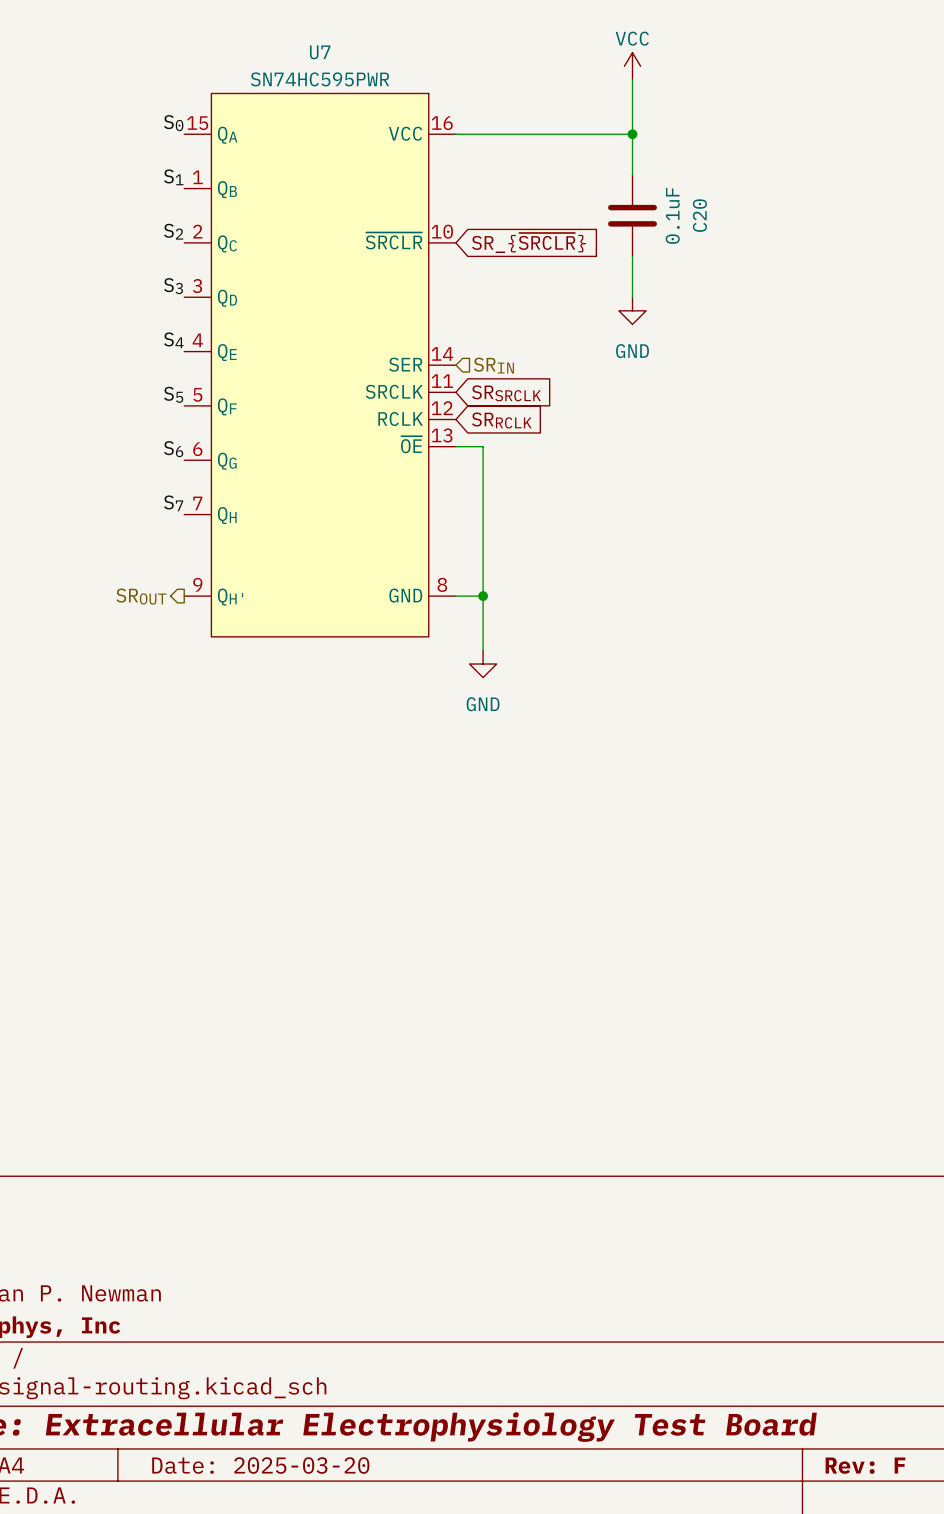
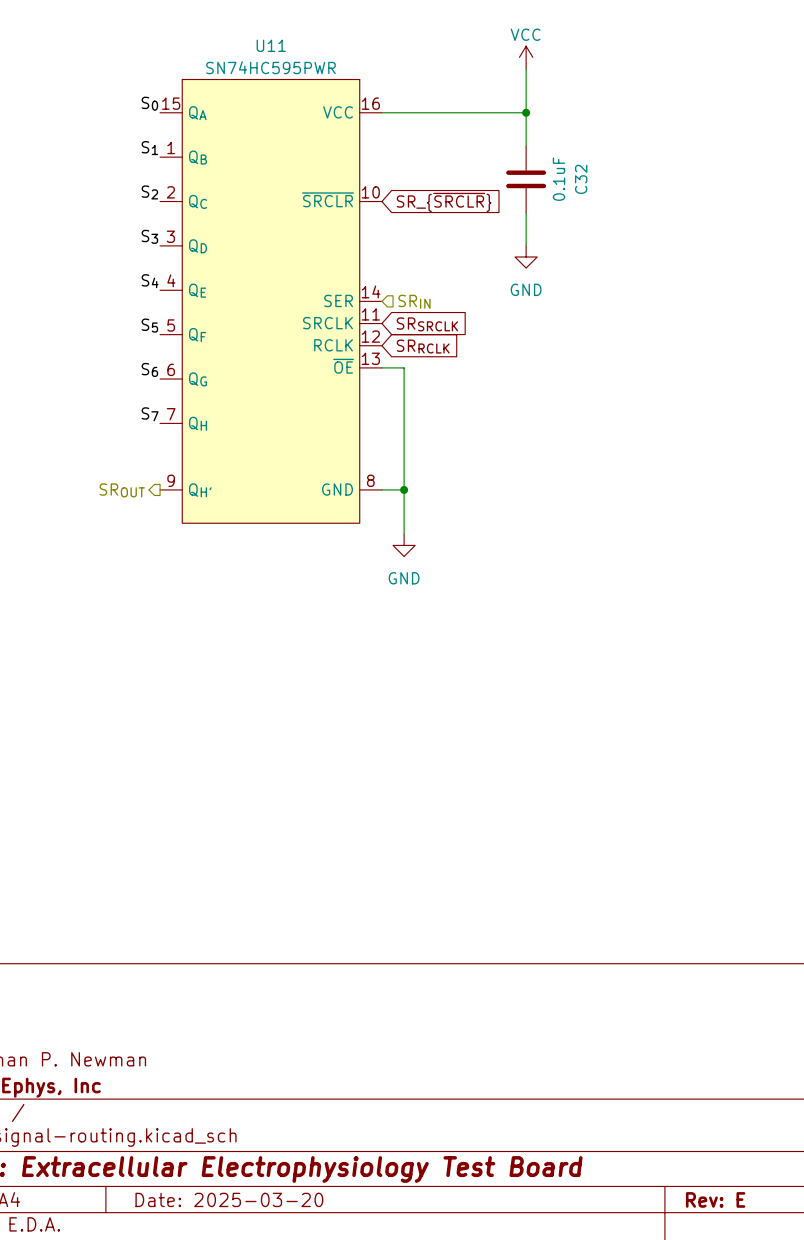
U7 name: U7 (320, 52) -> U11 (271, 45)
C20 name: C20 (699, 215) -> C32 (581, 179)
title block: Rev: F (865, 1465) -> Rev: E (715, 1199)

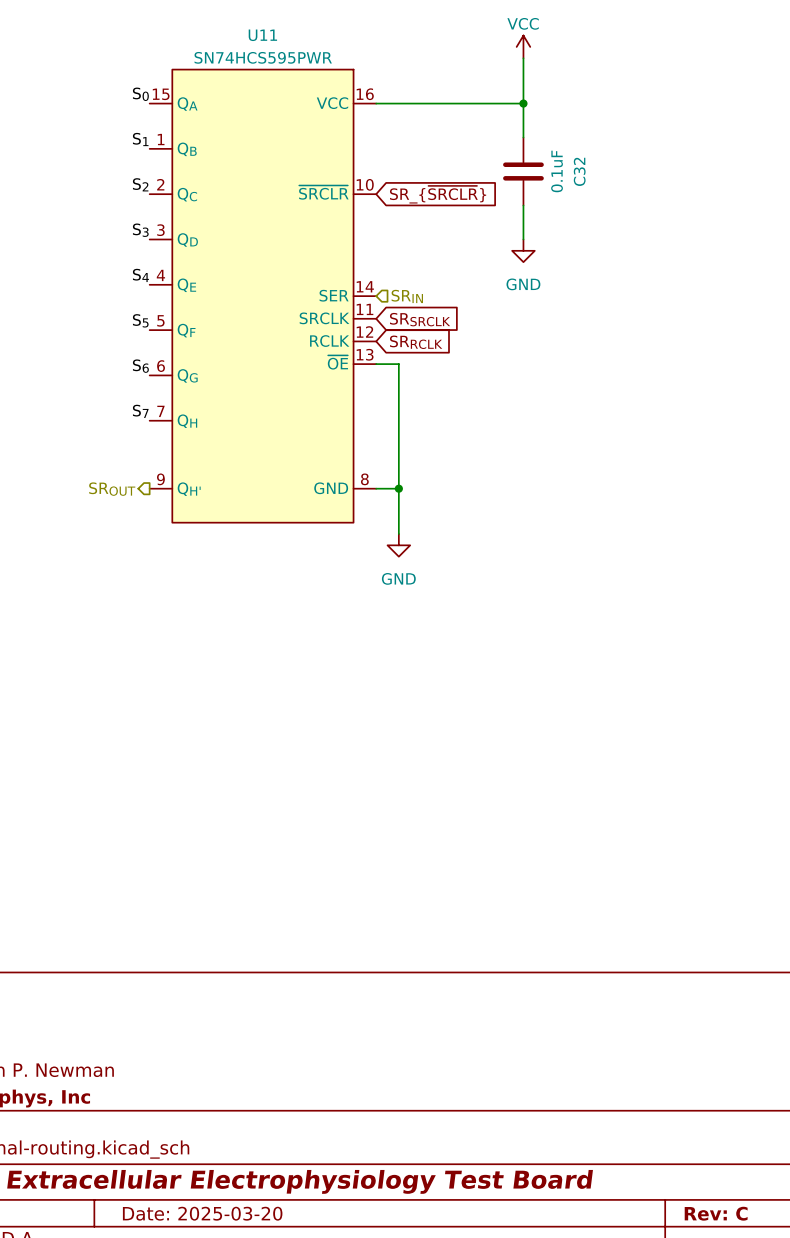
U11 value: SN74HC595PWR (270, 67) -> SN74HCS595PWR (263, 57)
title block: Rev: E (715, 1199) -> Rev: C (716, 1213)

